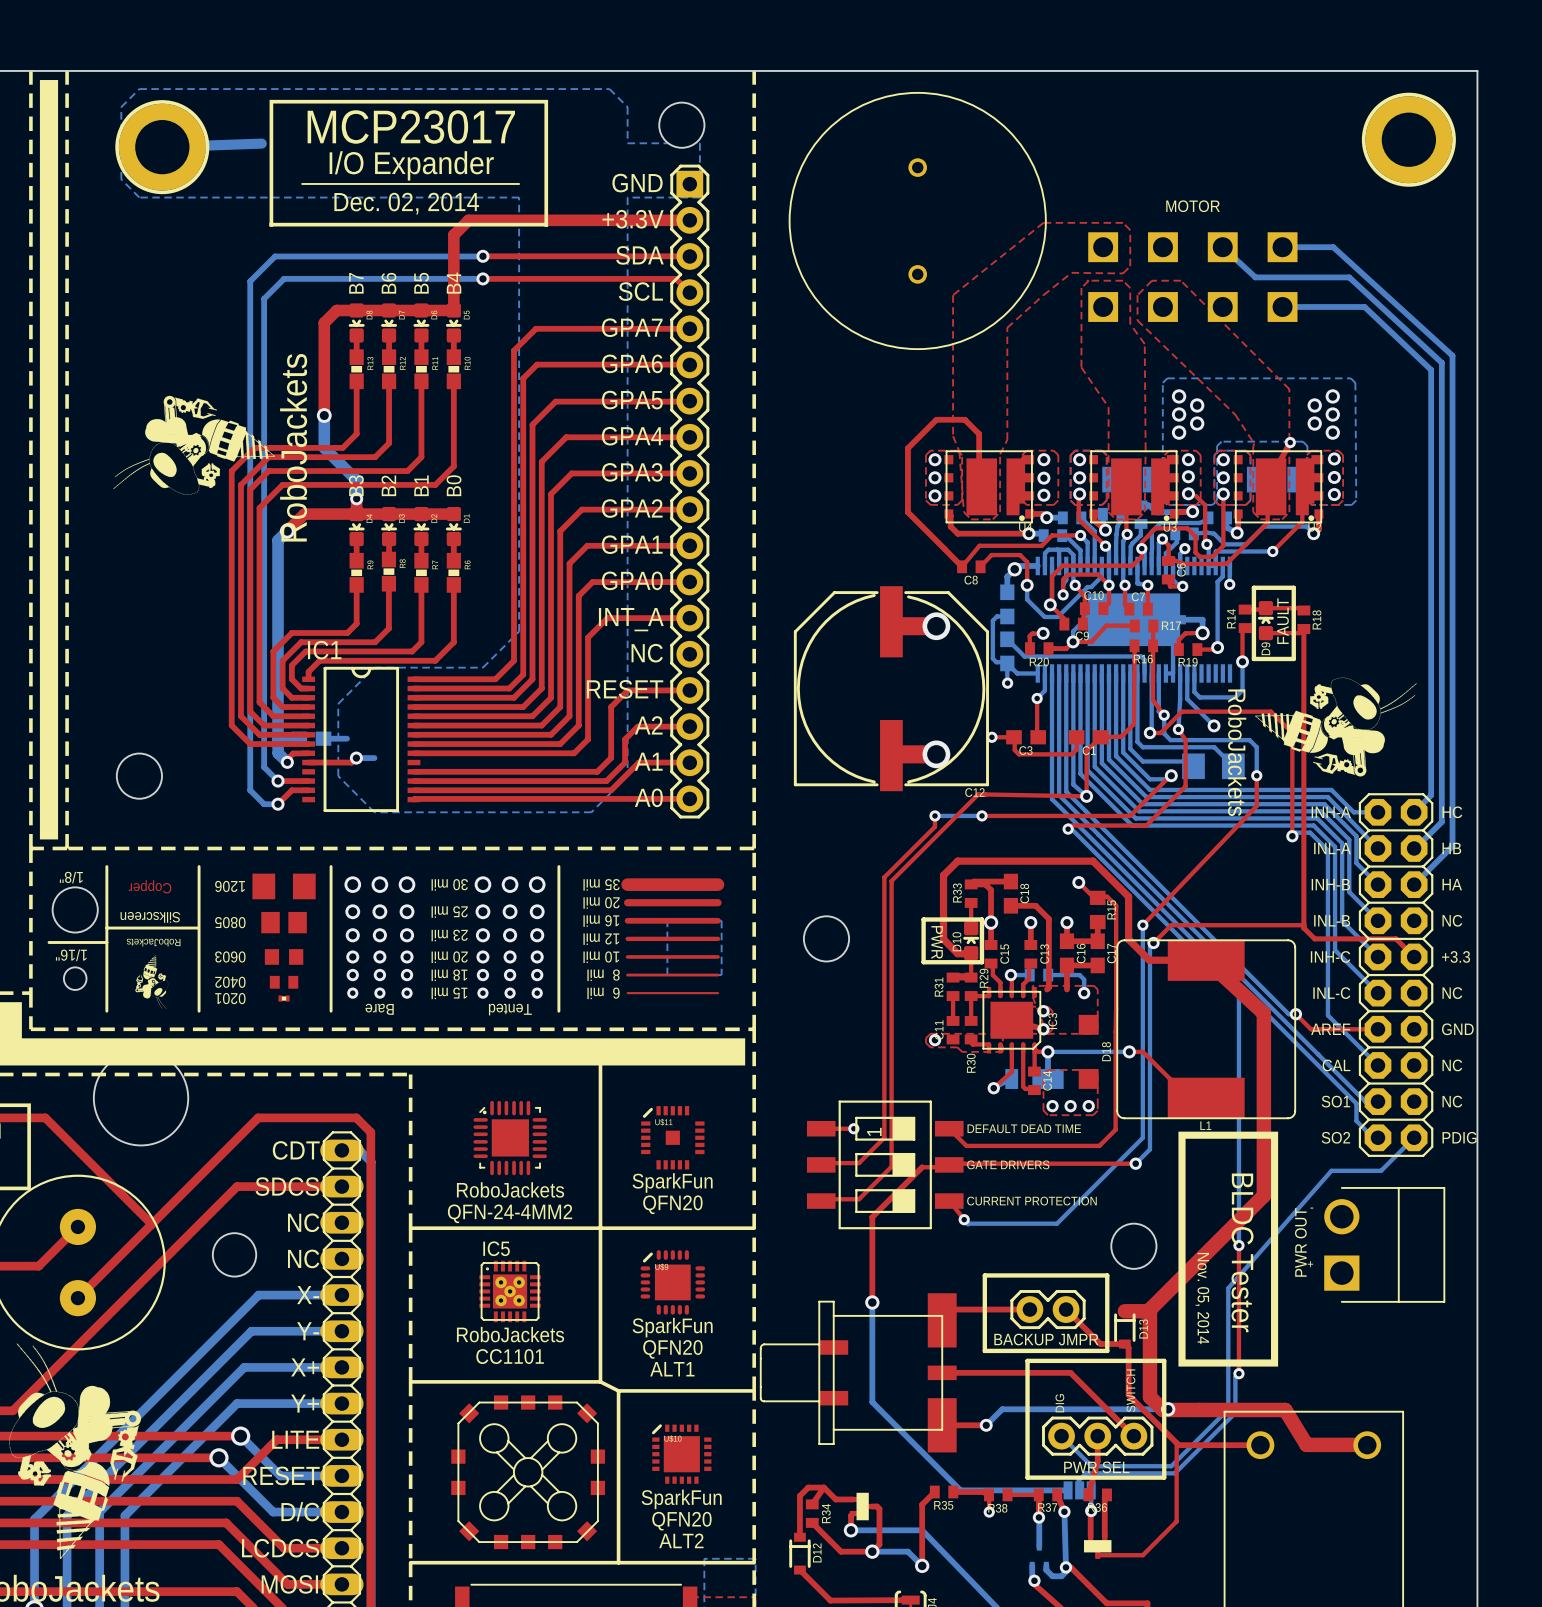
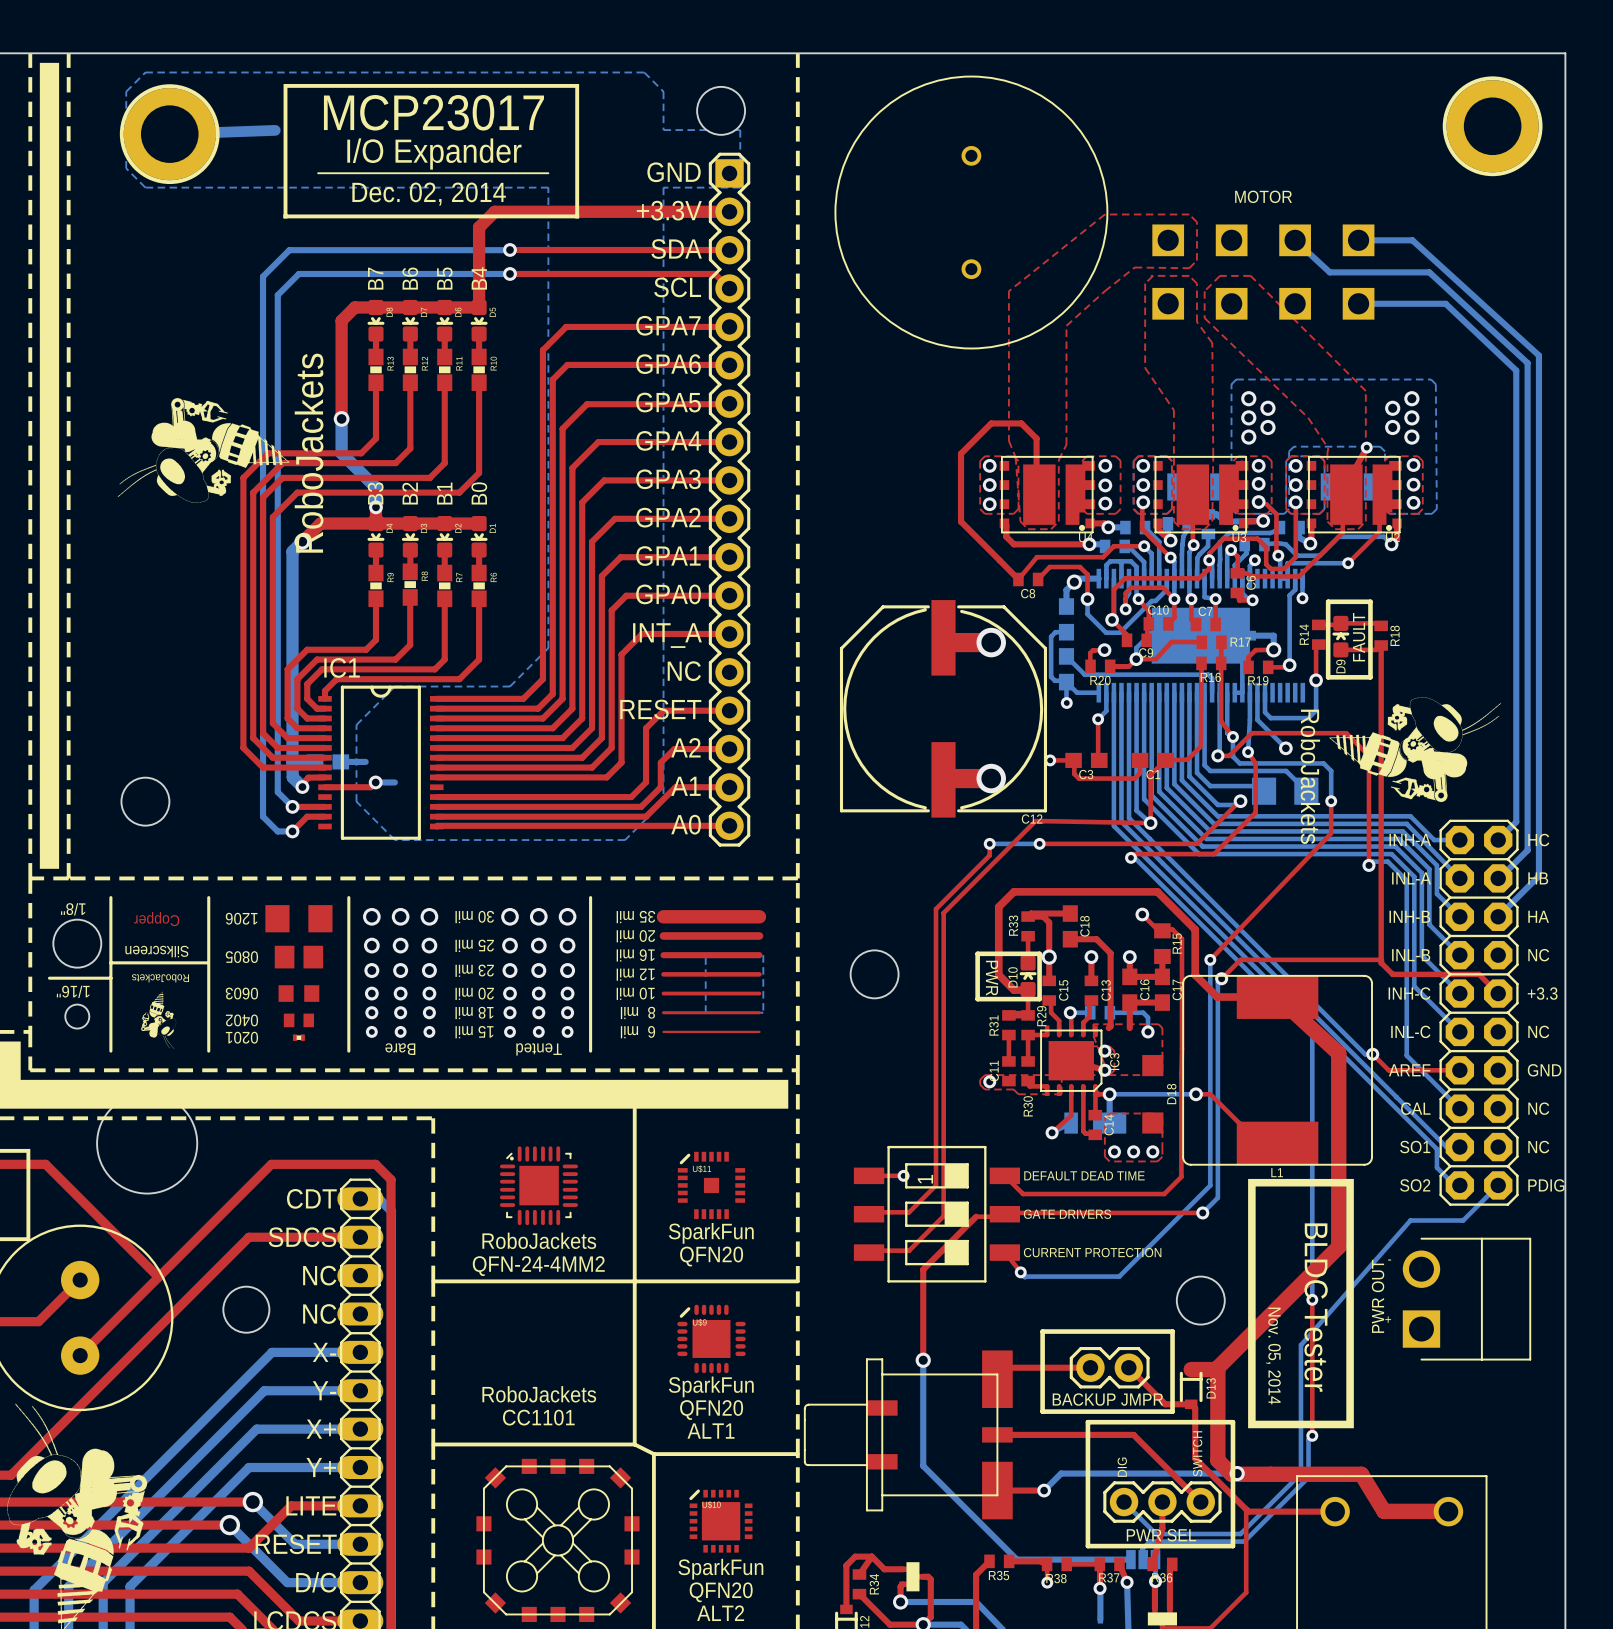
IC5: (510, 1291) -> none

